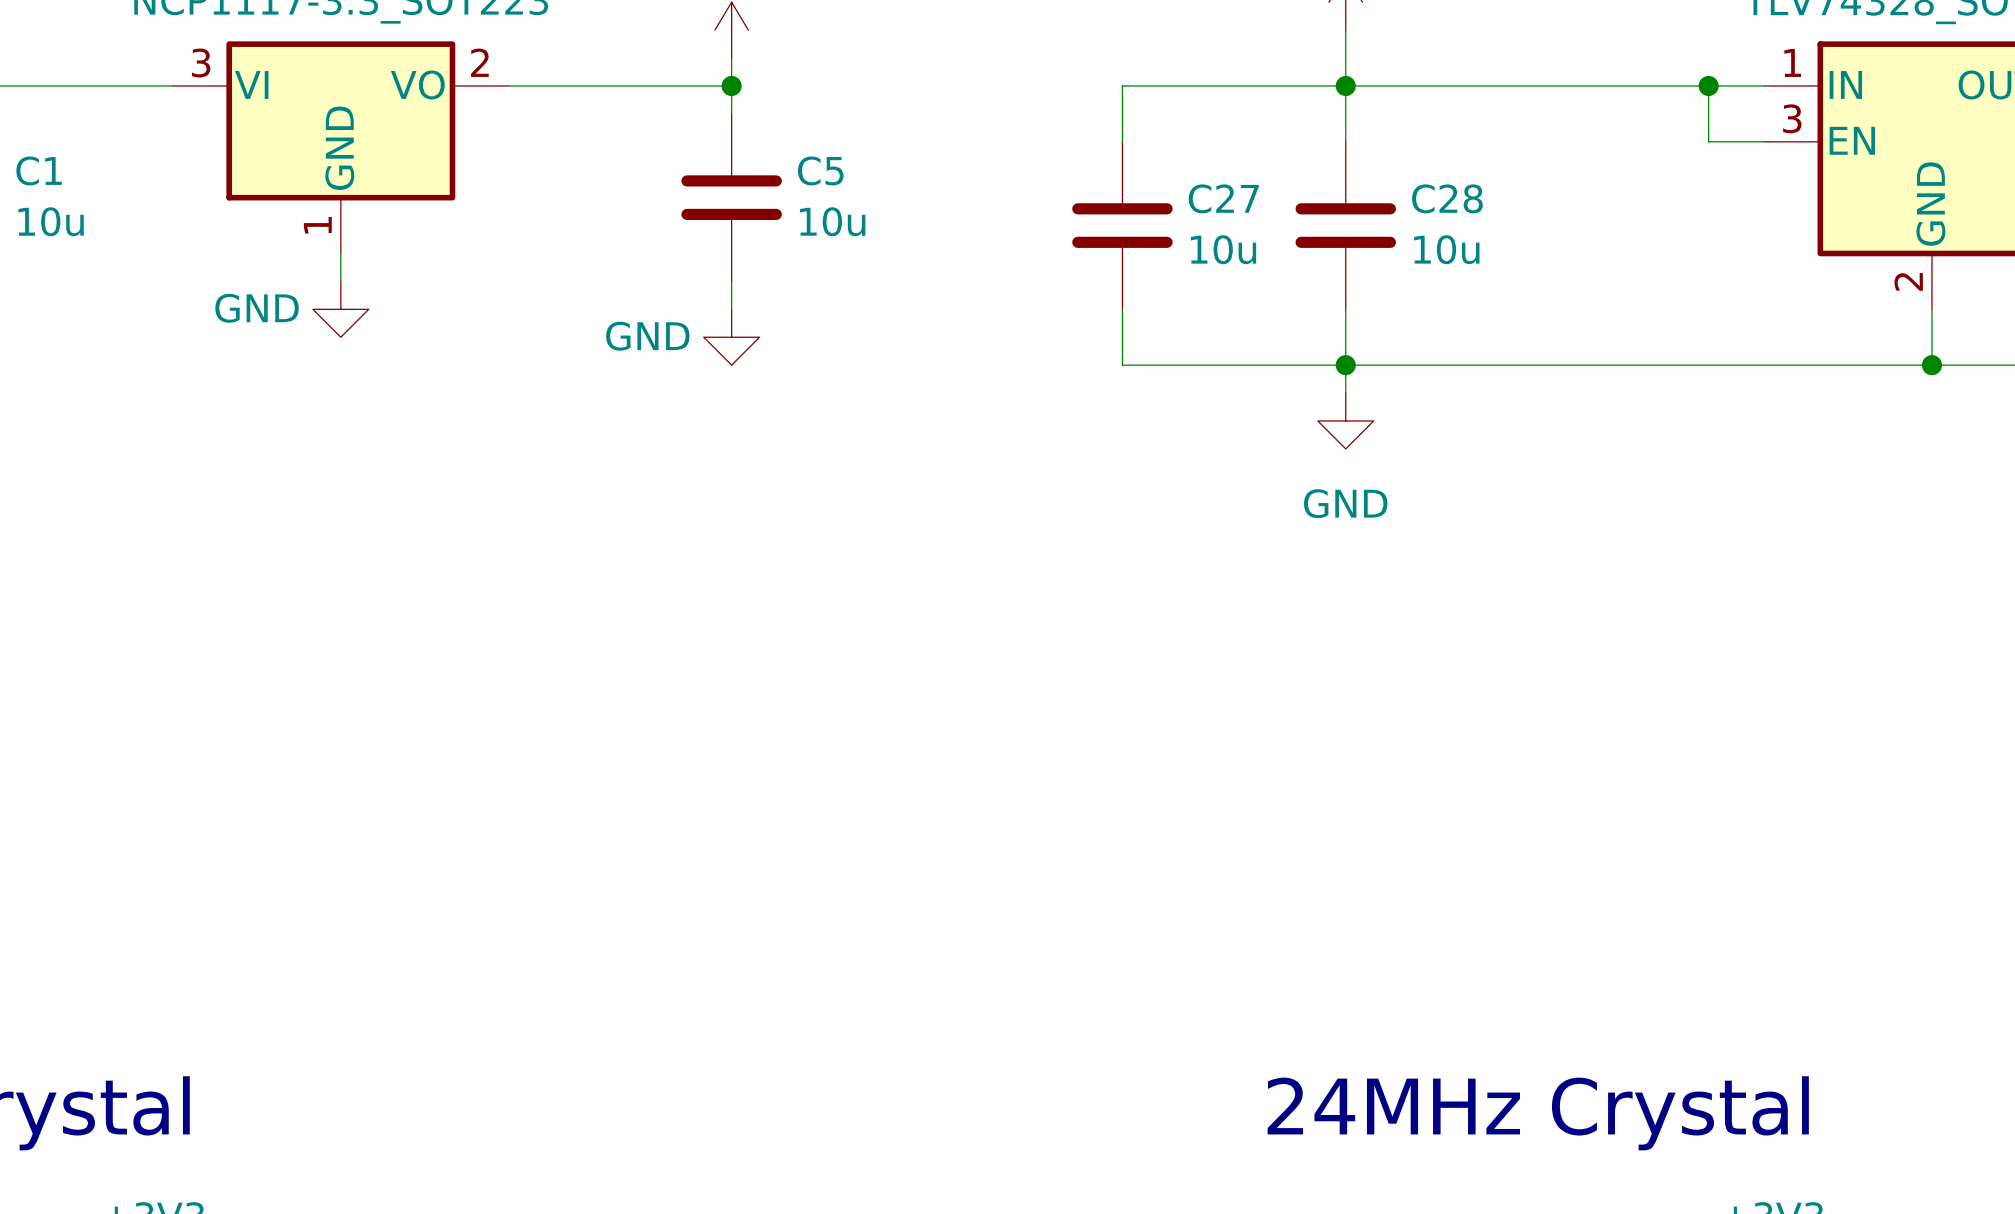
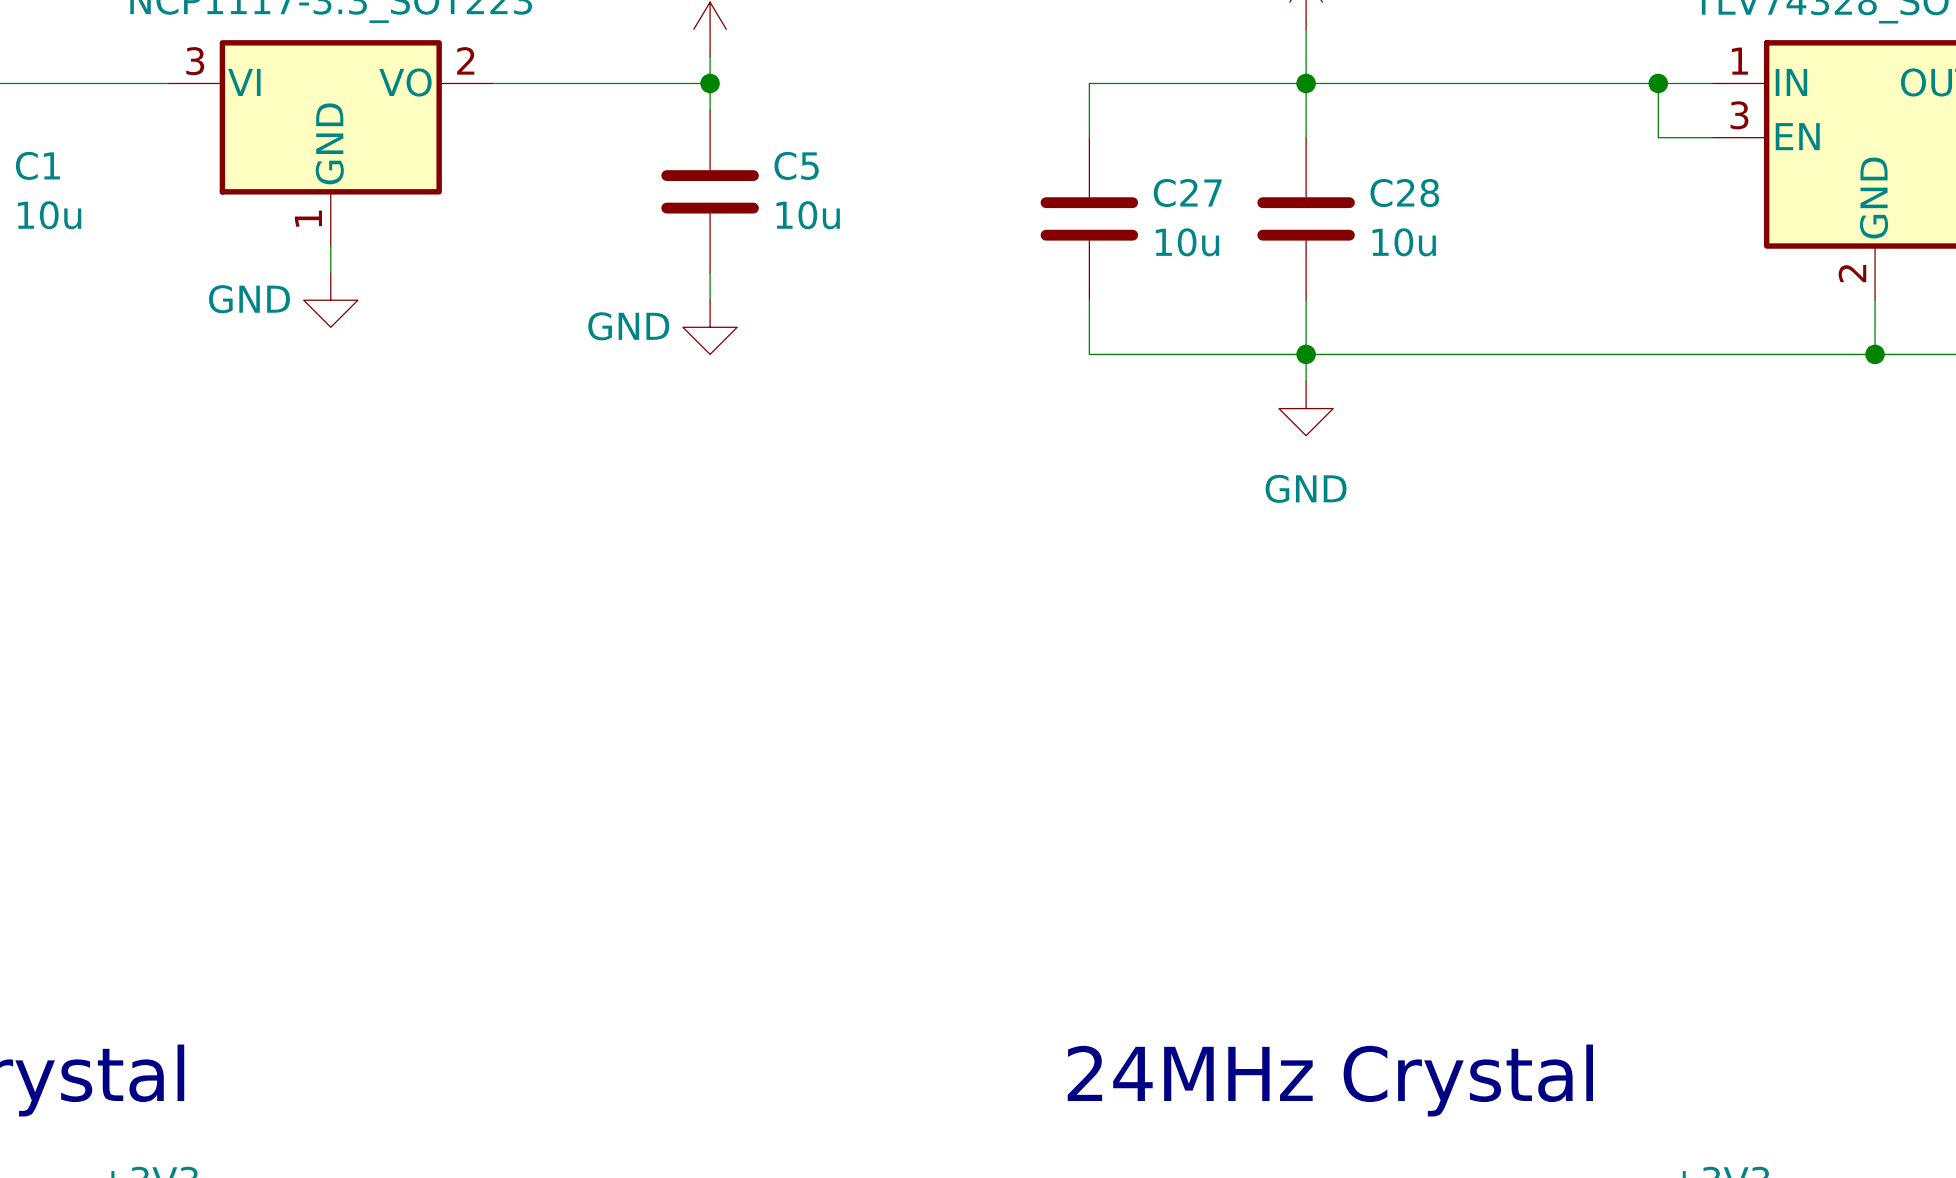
text position: 24MHz Crystal (1538, 1113) -> 24MHz Crystal (1330, 1080)

